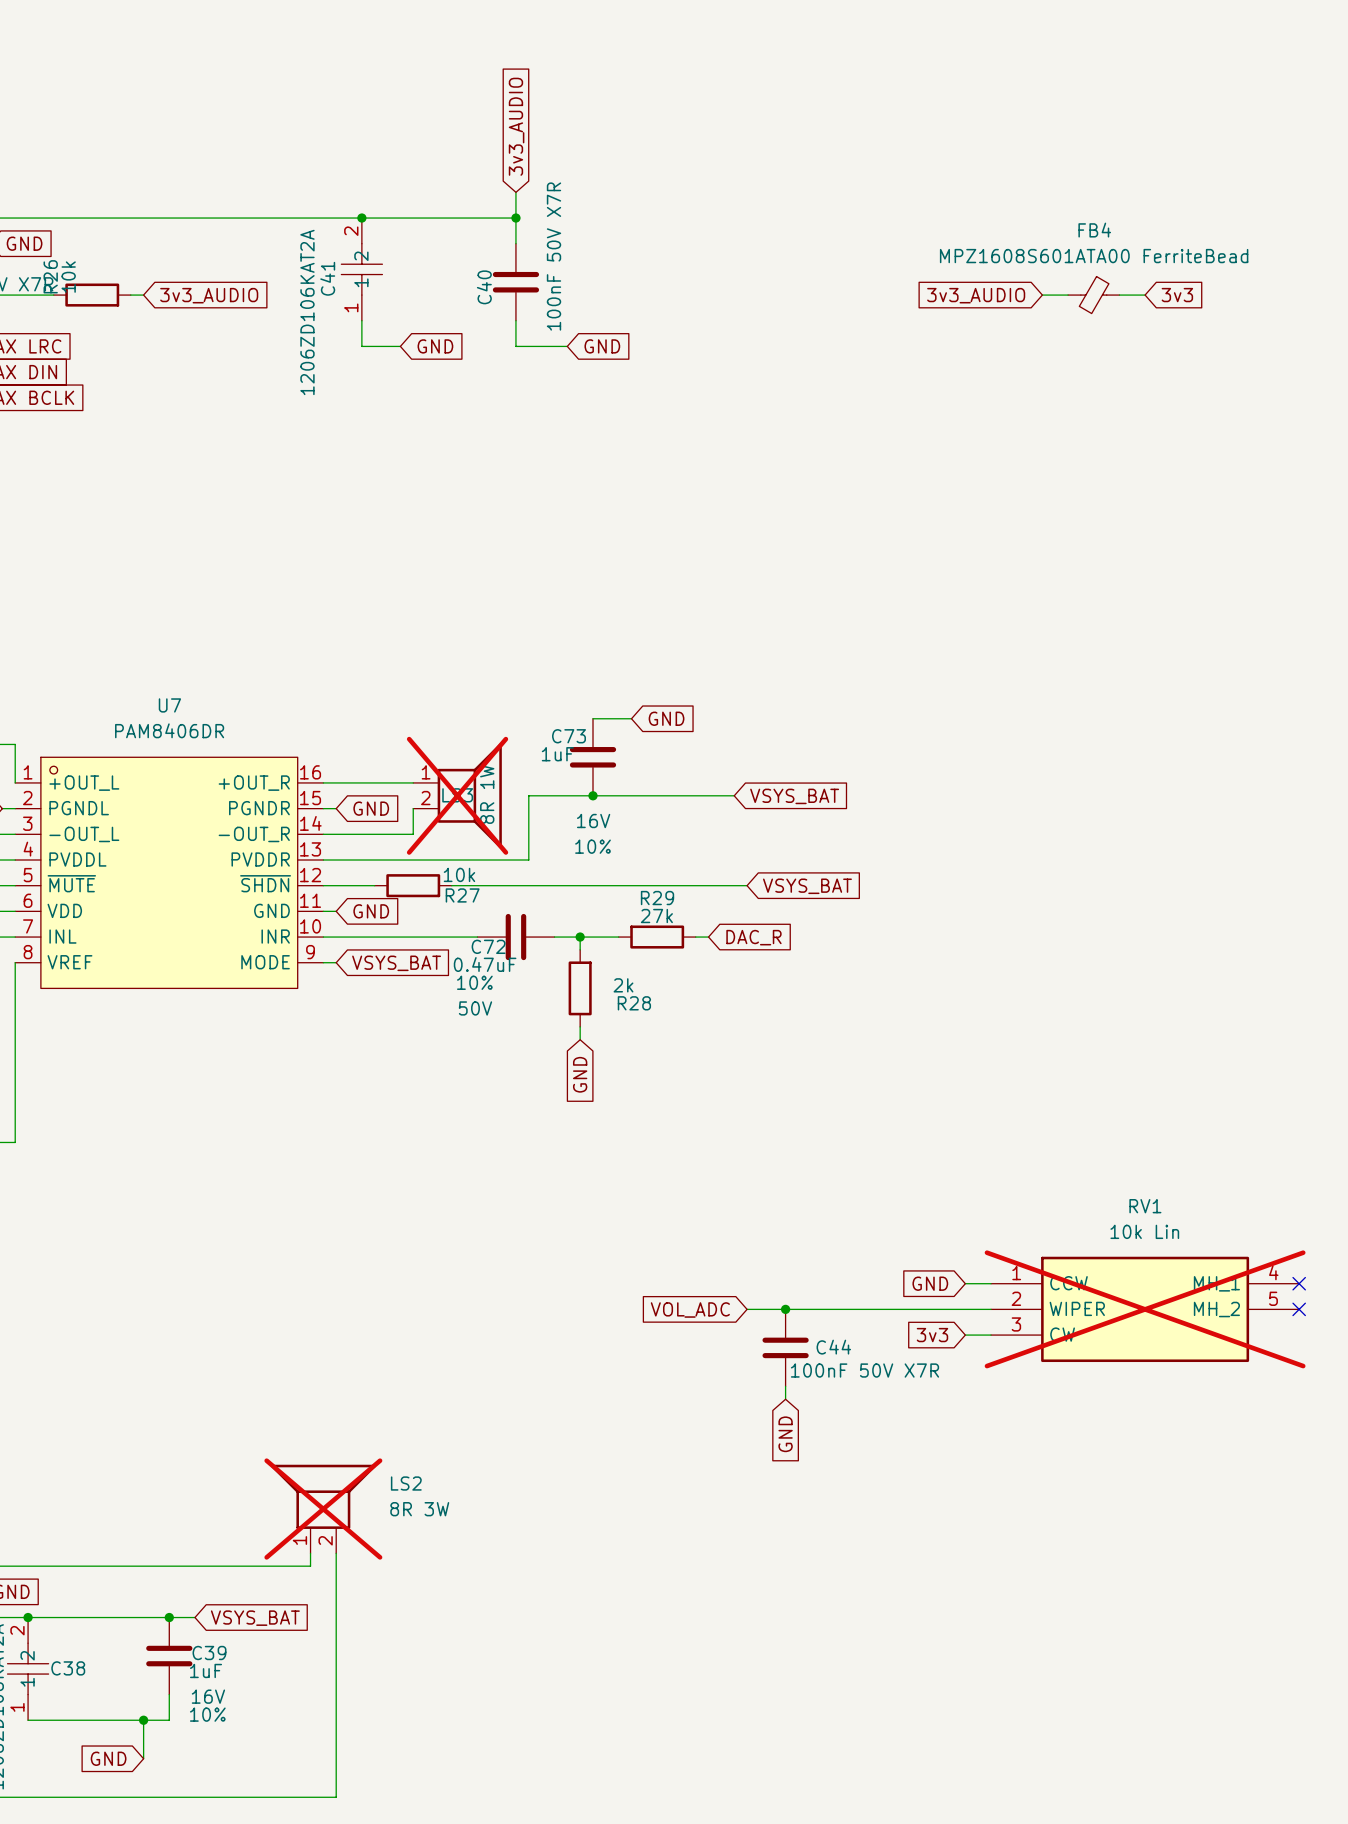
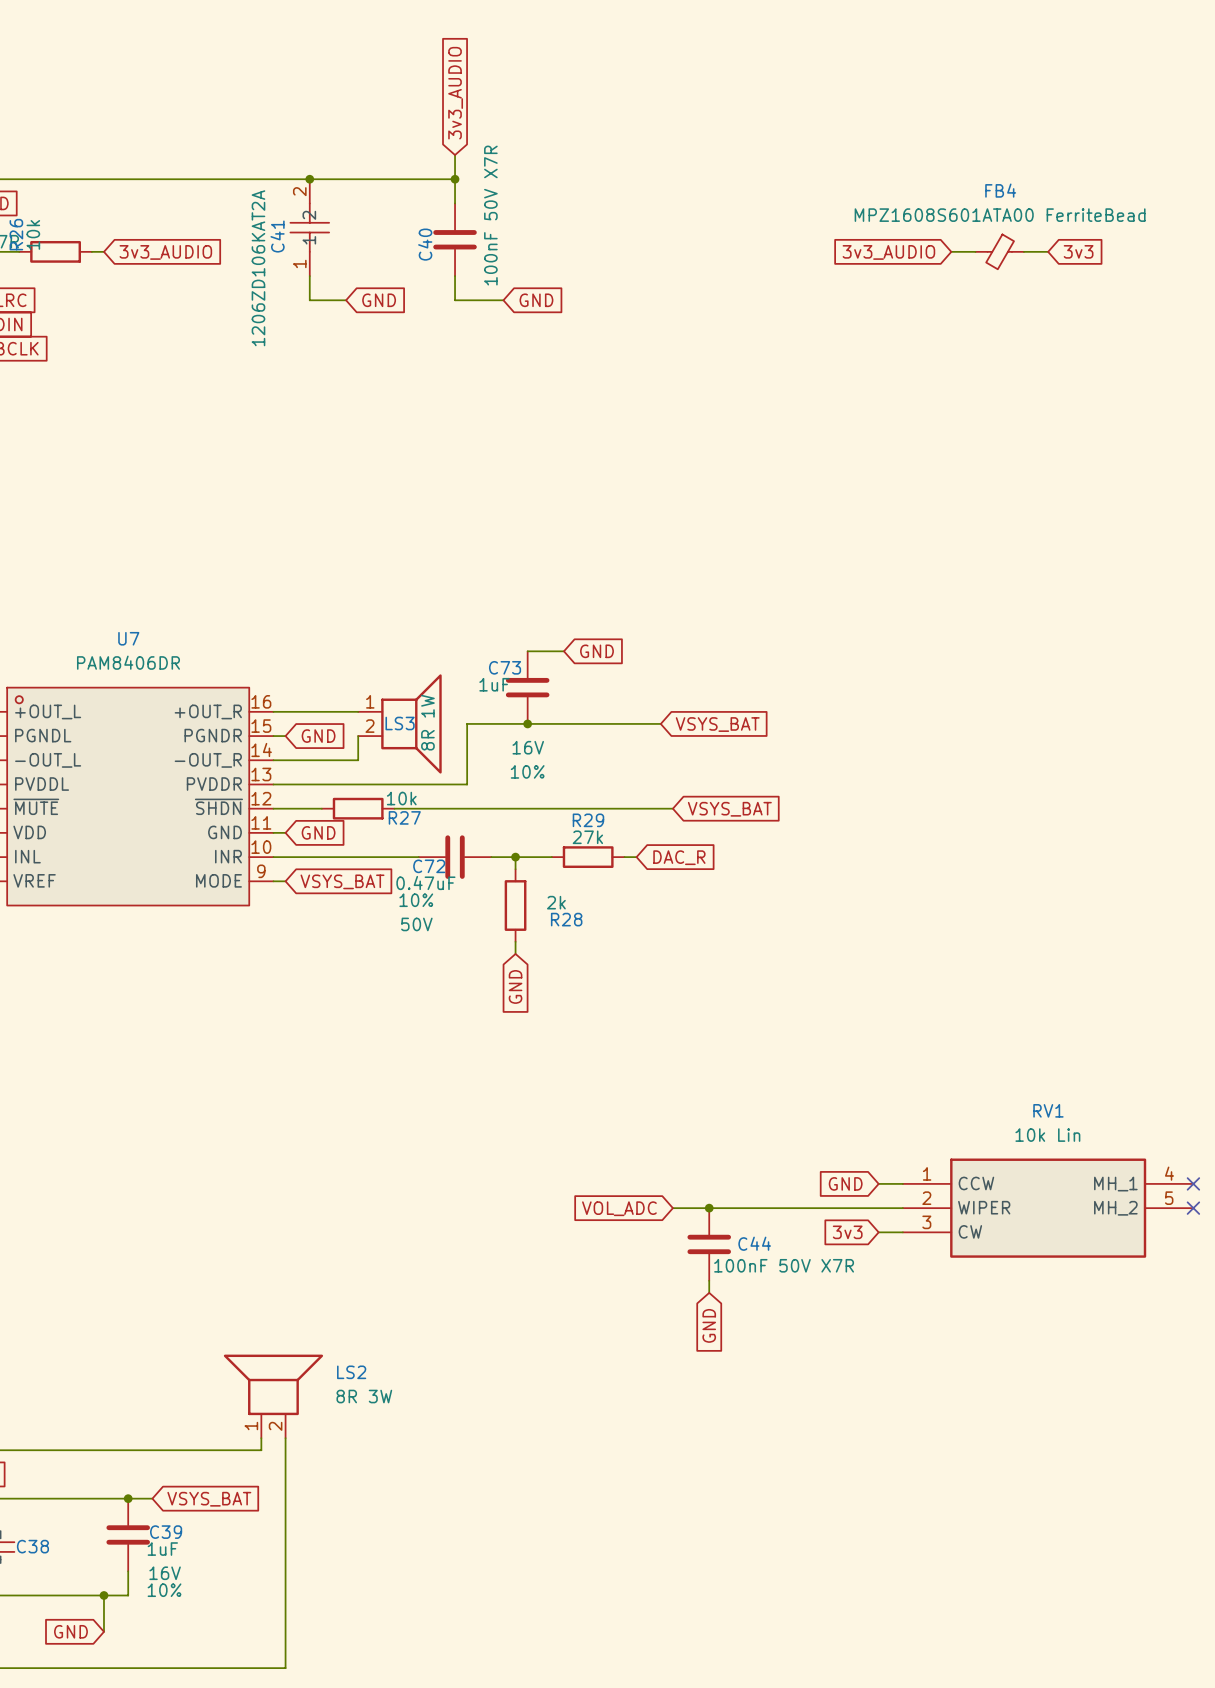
LS3 do-not-place cross: (457, 795) -> none
RV1 do-not-place cross: (1145, 1309) -> none
LS2 do-not-place cross: (323, 1509) -> none

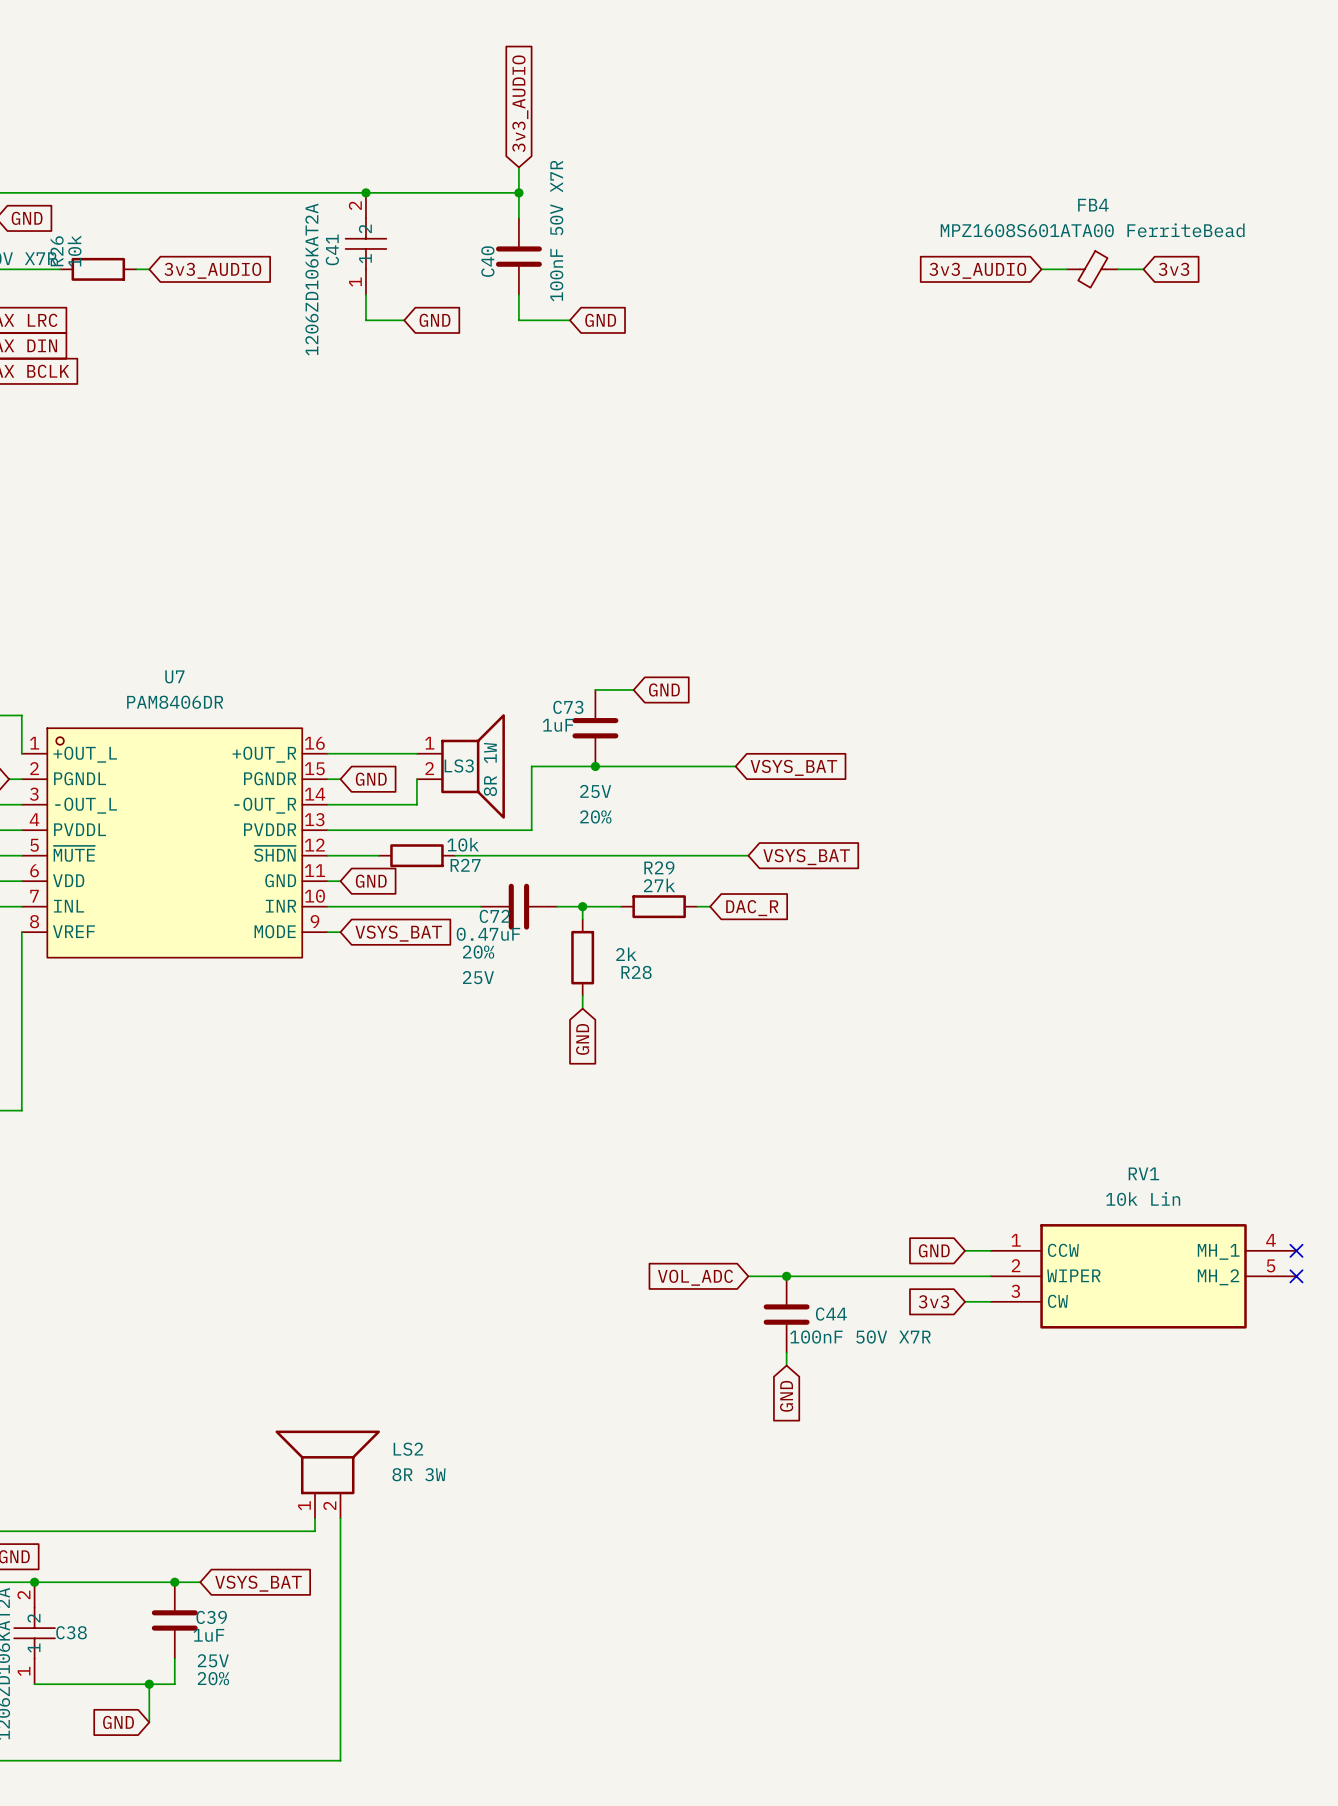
C73 text: 16V (528, 747) -> 25V (595, 791)
C73 text: 10% (527, 771) -> 20% (595, 816)
C72 text: 10% (416, 900) -> 20% (478, 952)
C72 text: 50V (416, 924) -> 25V (478, 977)
C39 text: 16V (165, 1573) -> 25V (213, 1660)
C39 text: 10% (164, 1590) -> 20% (213, 1678)

